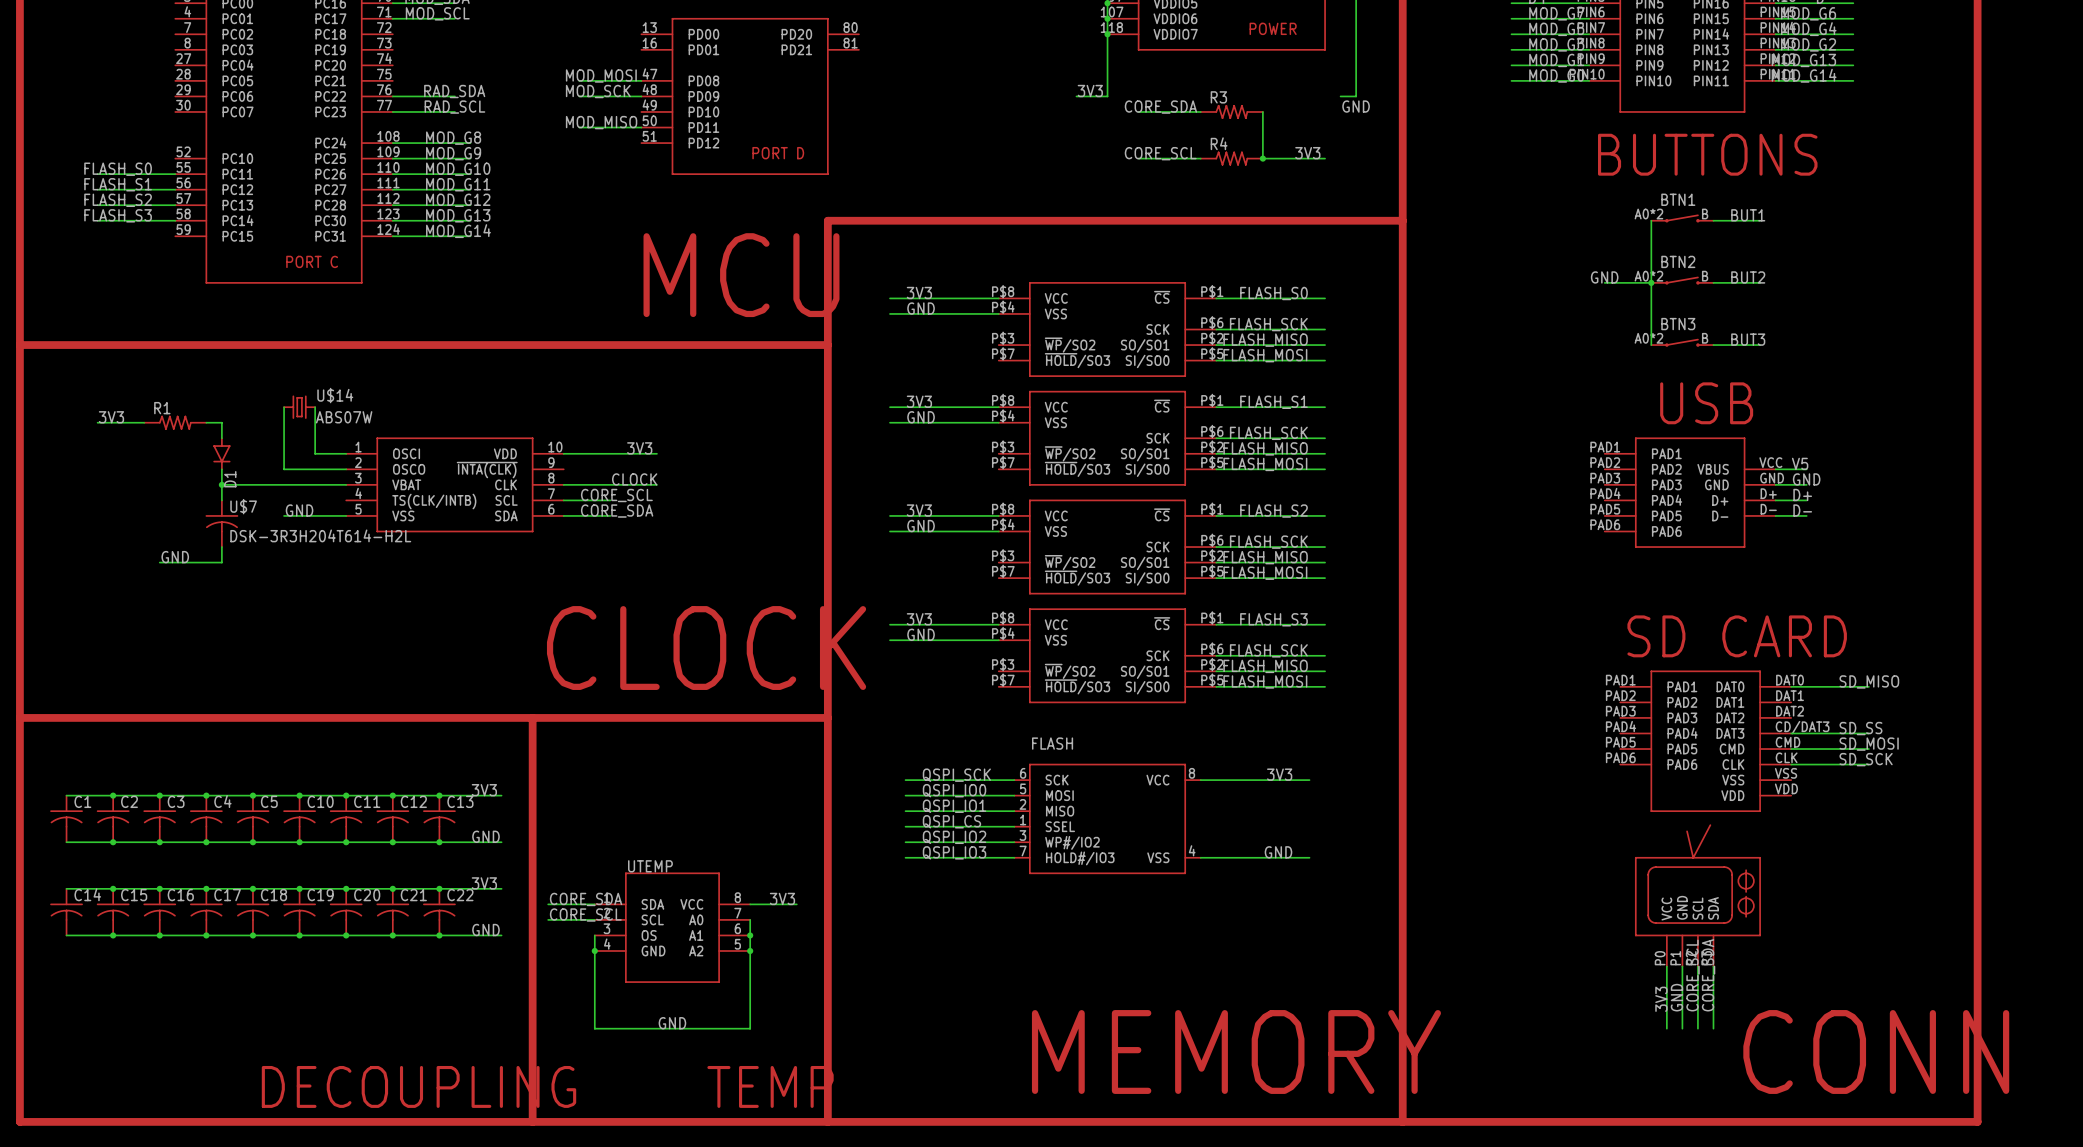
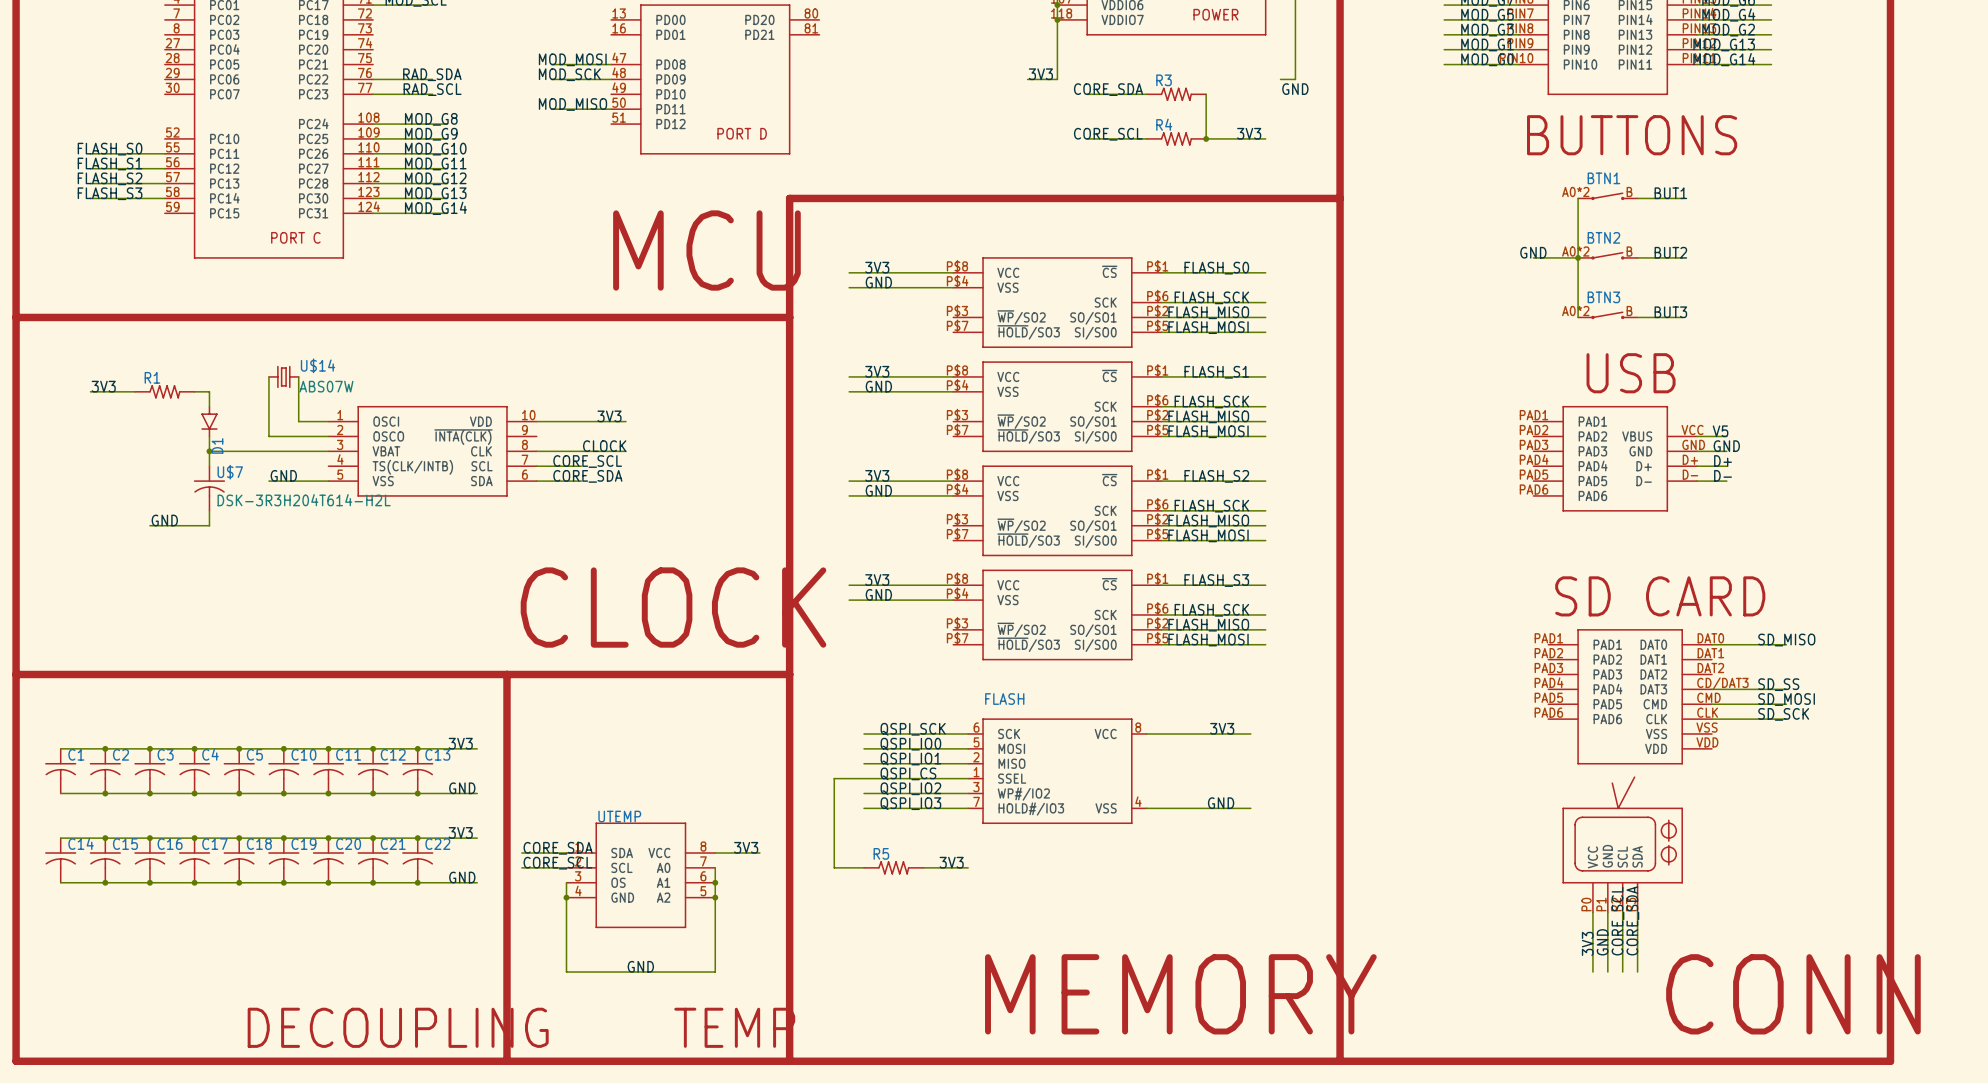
wire: none -> (864, 778) (834, 778) (834, 867) (864, 867)
label: none -> 3V3 (951, 862)
R5: none -> (893, 867)
wire: none -> (923, 867) (968, 867)

